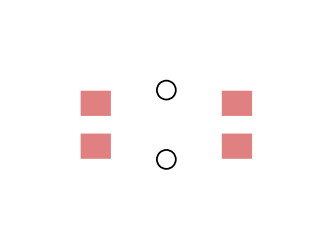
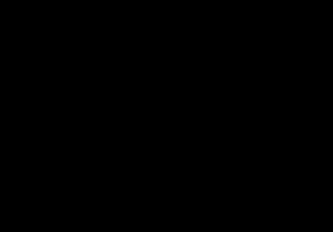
part: (166, 124) -> none

